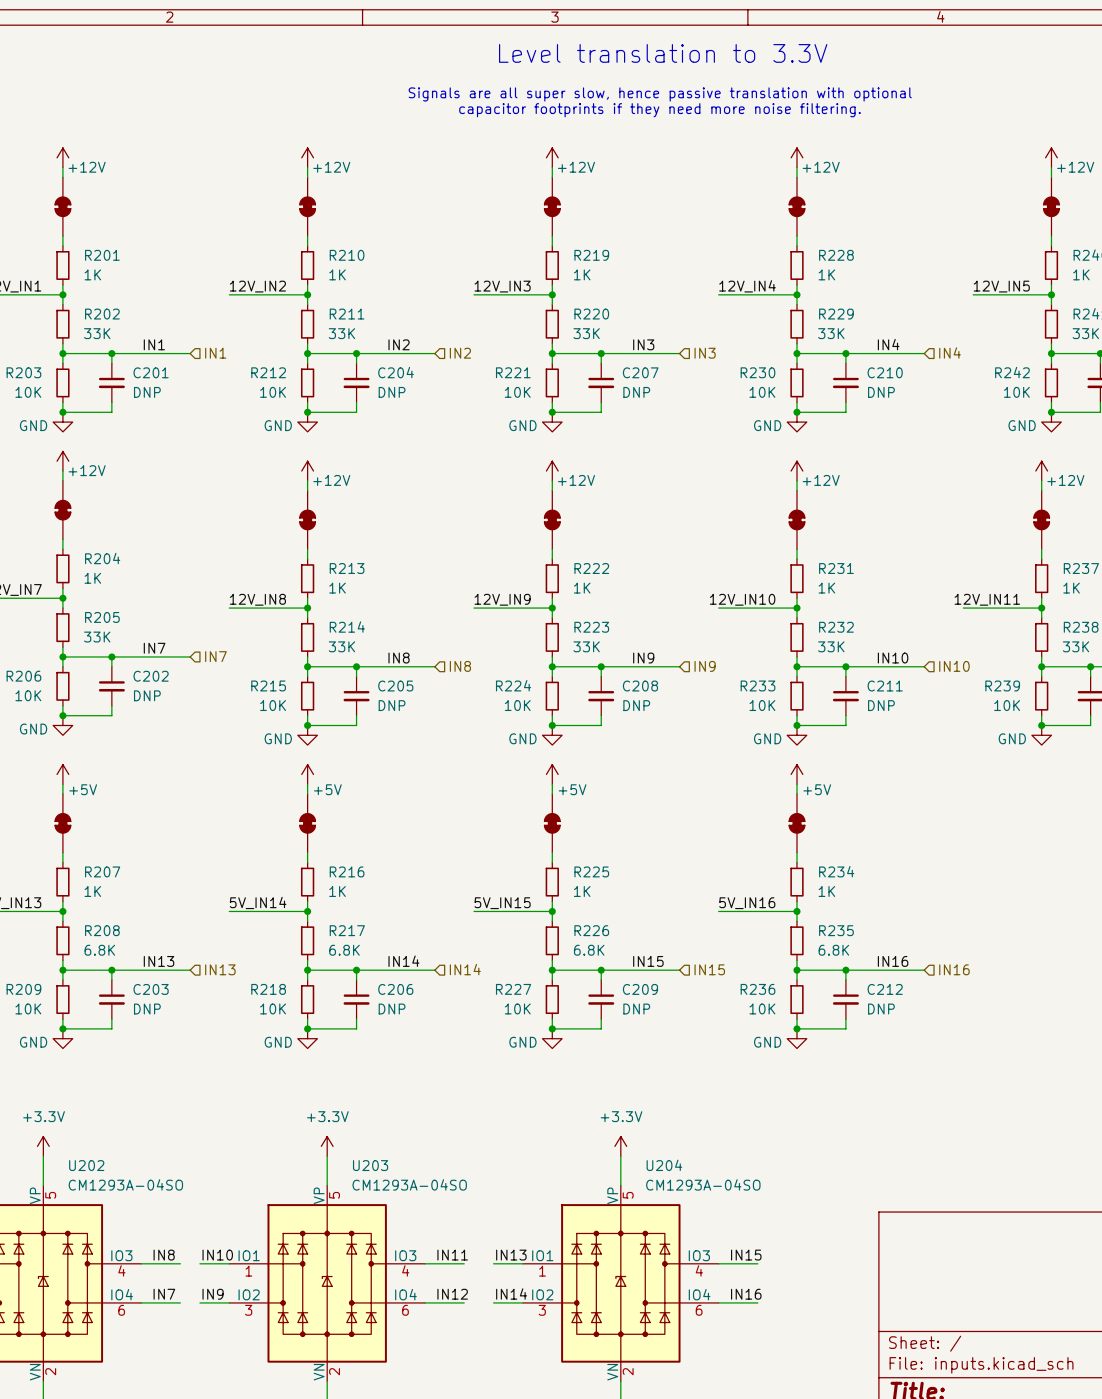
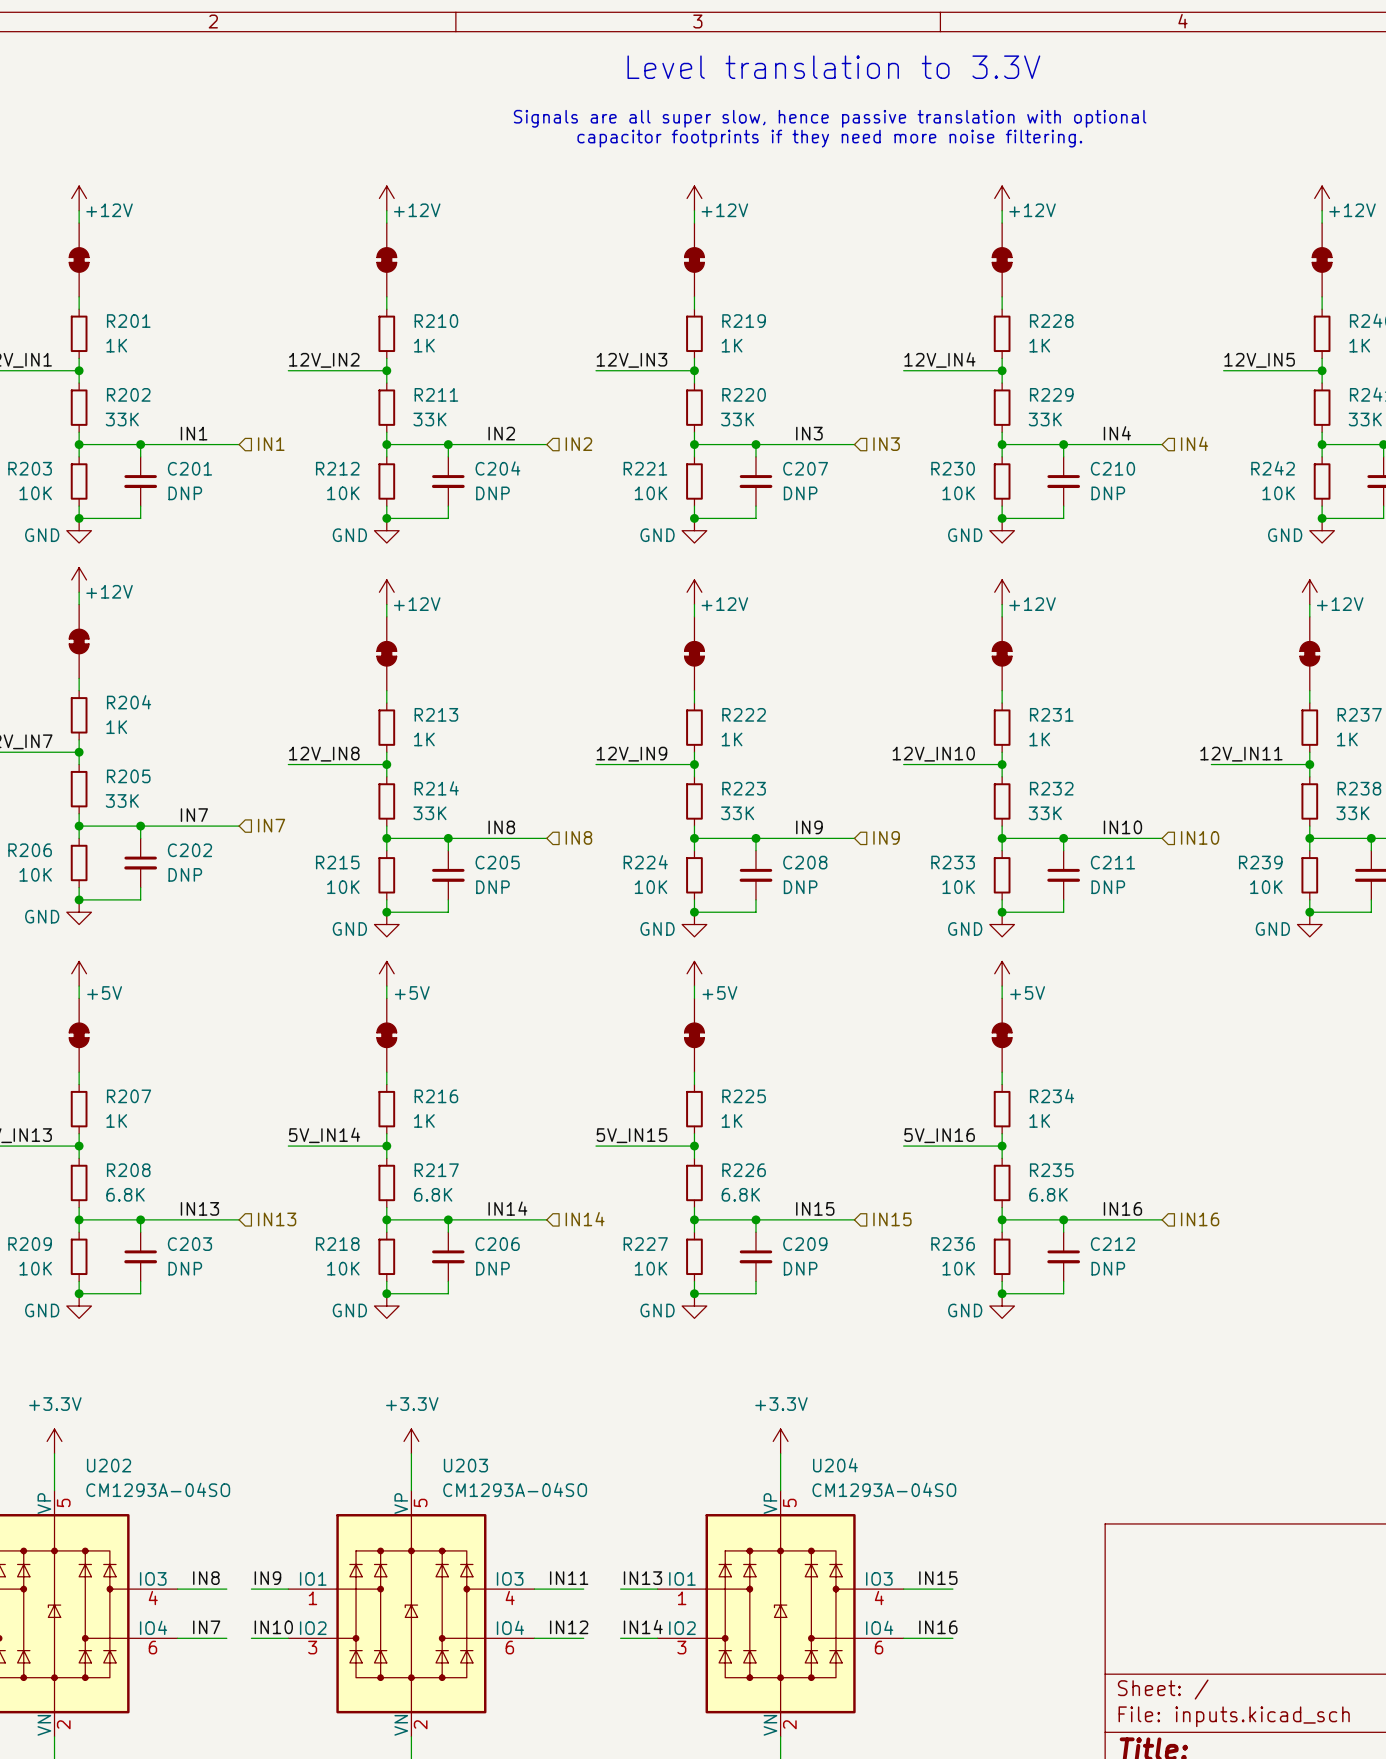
label: IN10 (217, 1255) -> IN9 (267, 1578)
label: IN9 (213, 1294) -> IN10 (273, 1627)

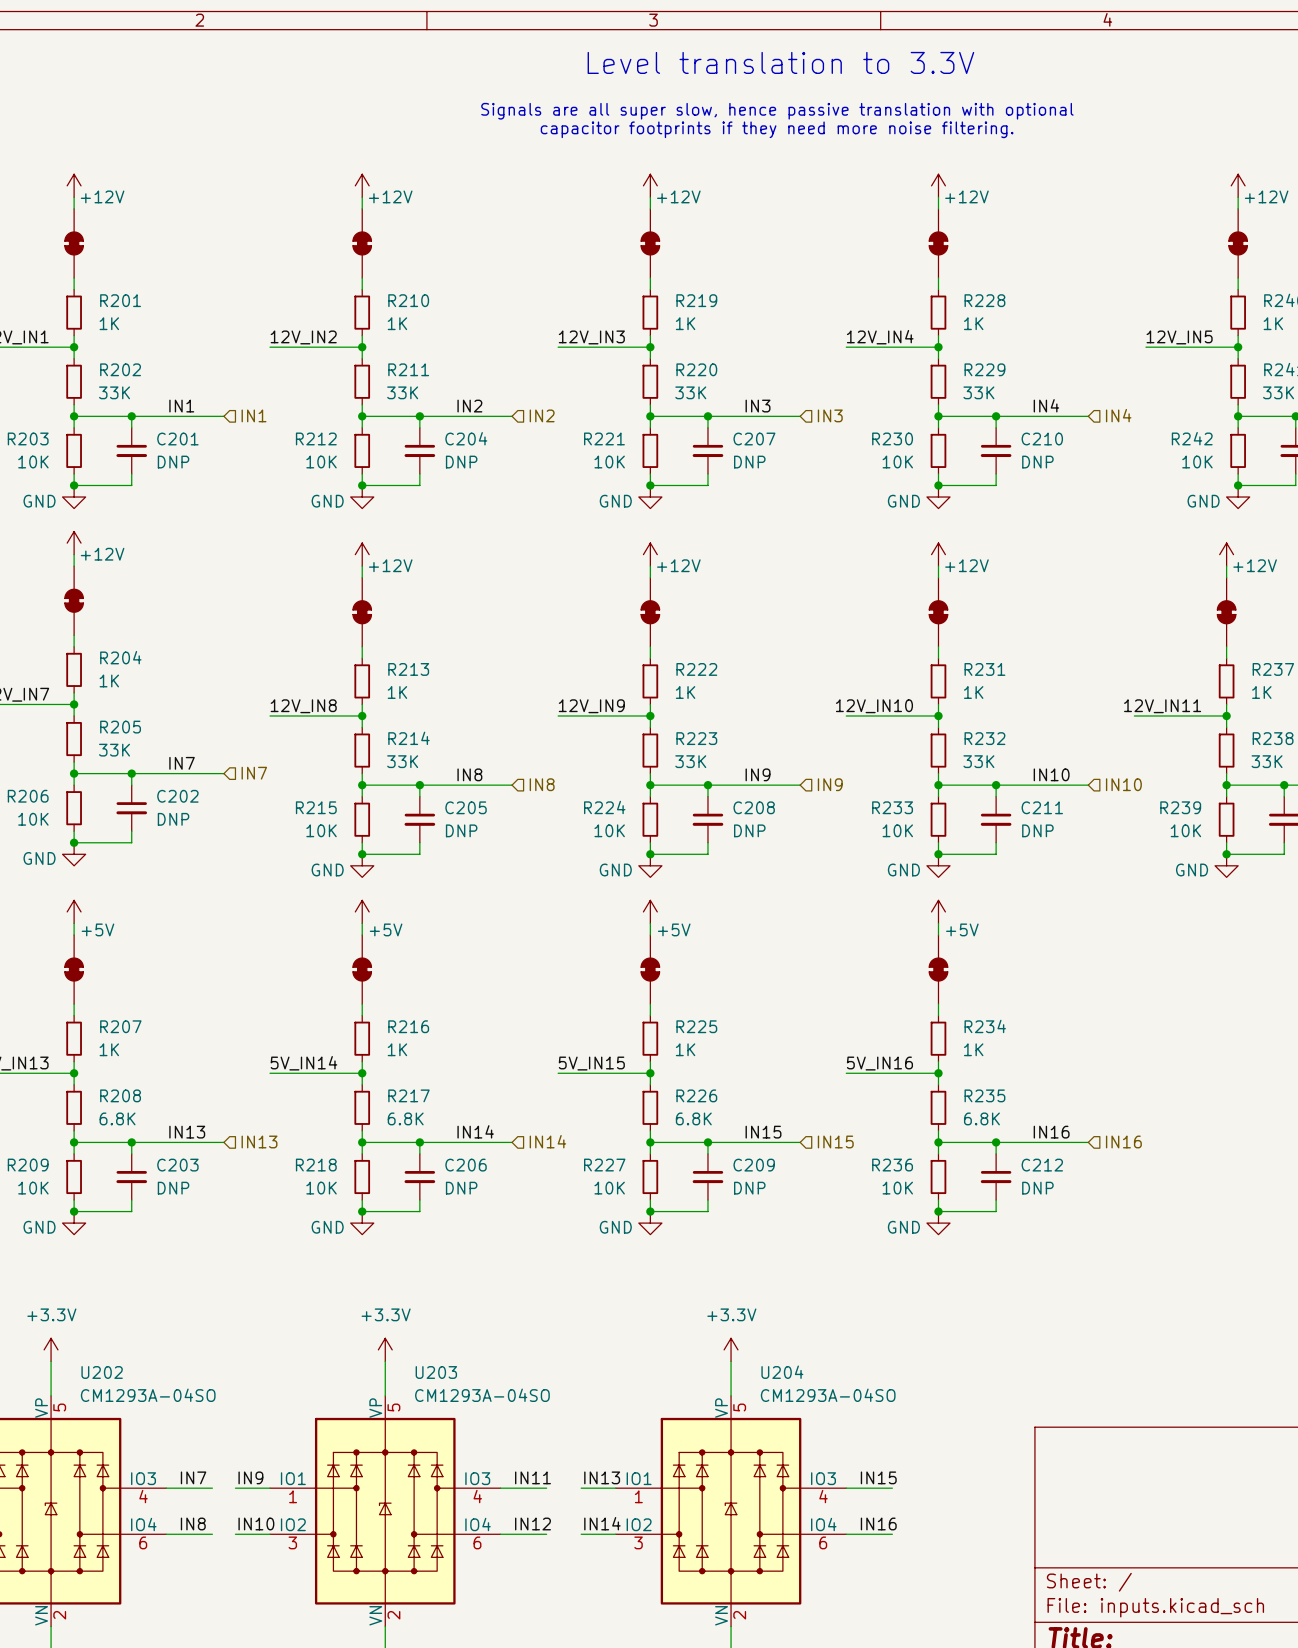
label: IN8 (206, 1578) -> IN7 (193, 1477)
label: IN7 (206, 1627) -> IN8 (193, 1523)

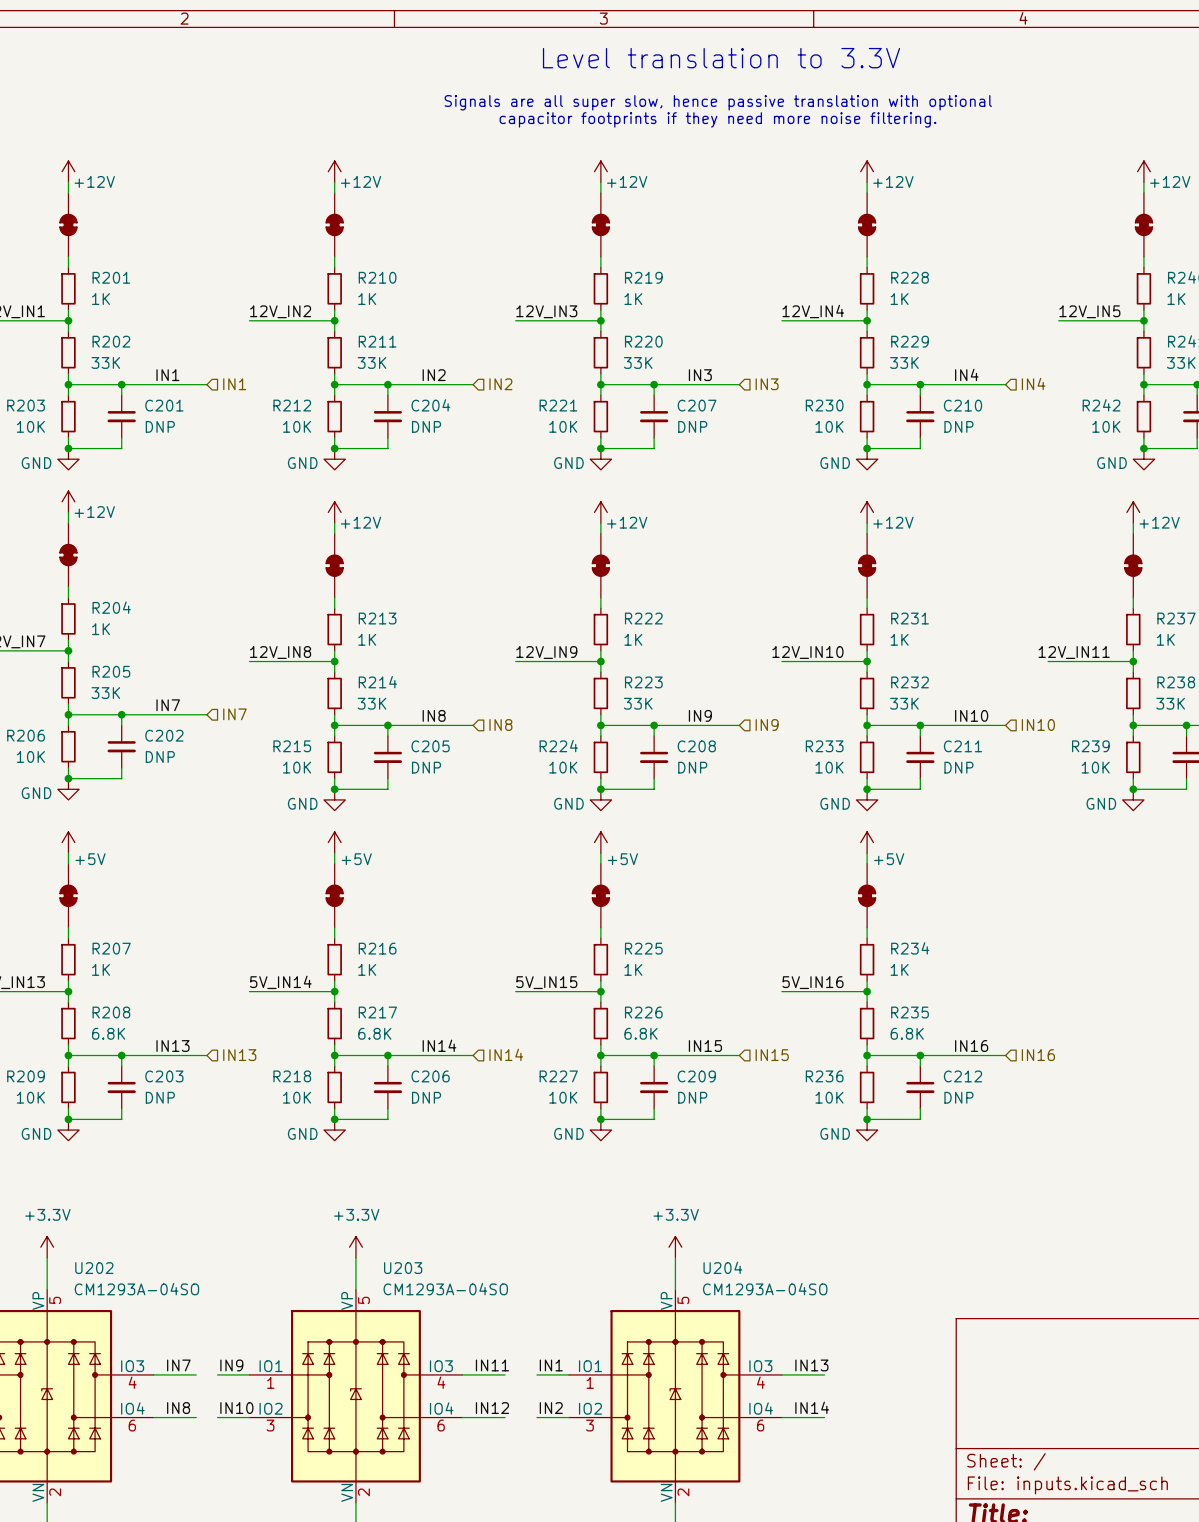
label: IN13 (602, 1477) -> IN1 (551, 1365)
label: IN15 (878, 1477) -> IN13 (811, 1365)
label: IN14 (602, 1523) -> IN2 (551, 1408)
label: IN16 (878, 1523) -> IN14 (812, 1407)

